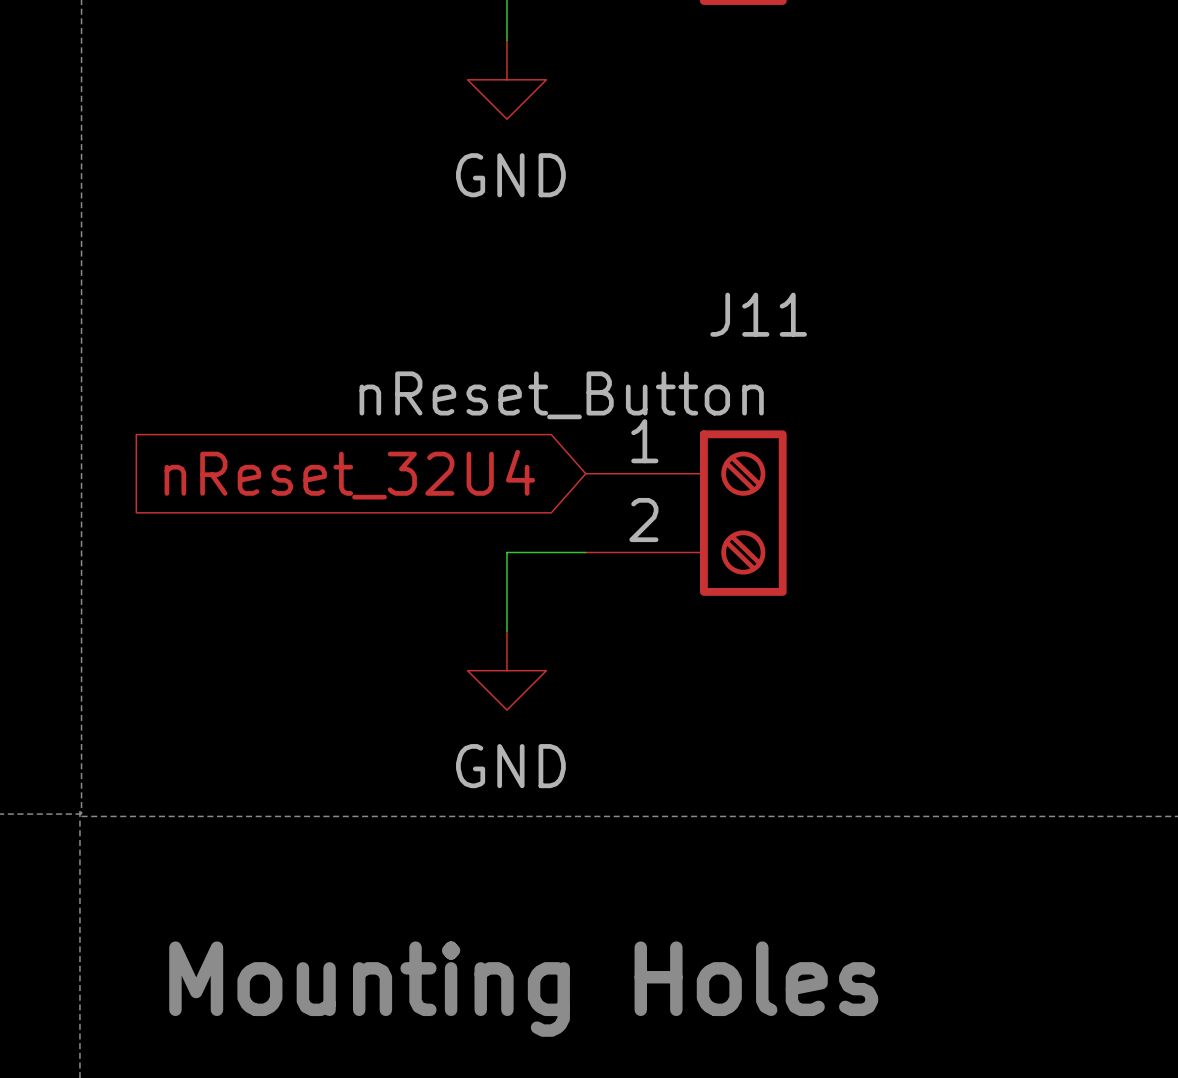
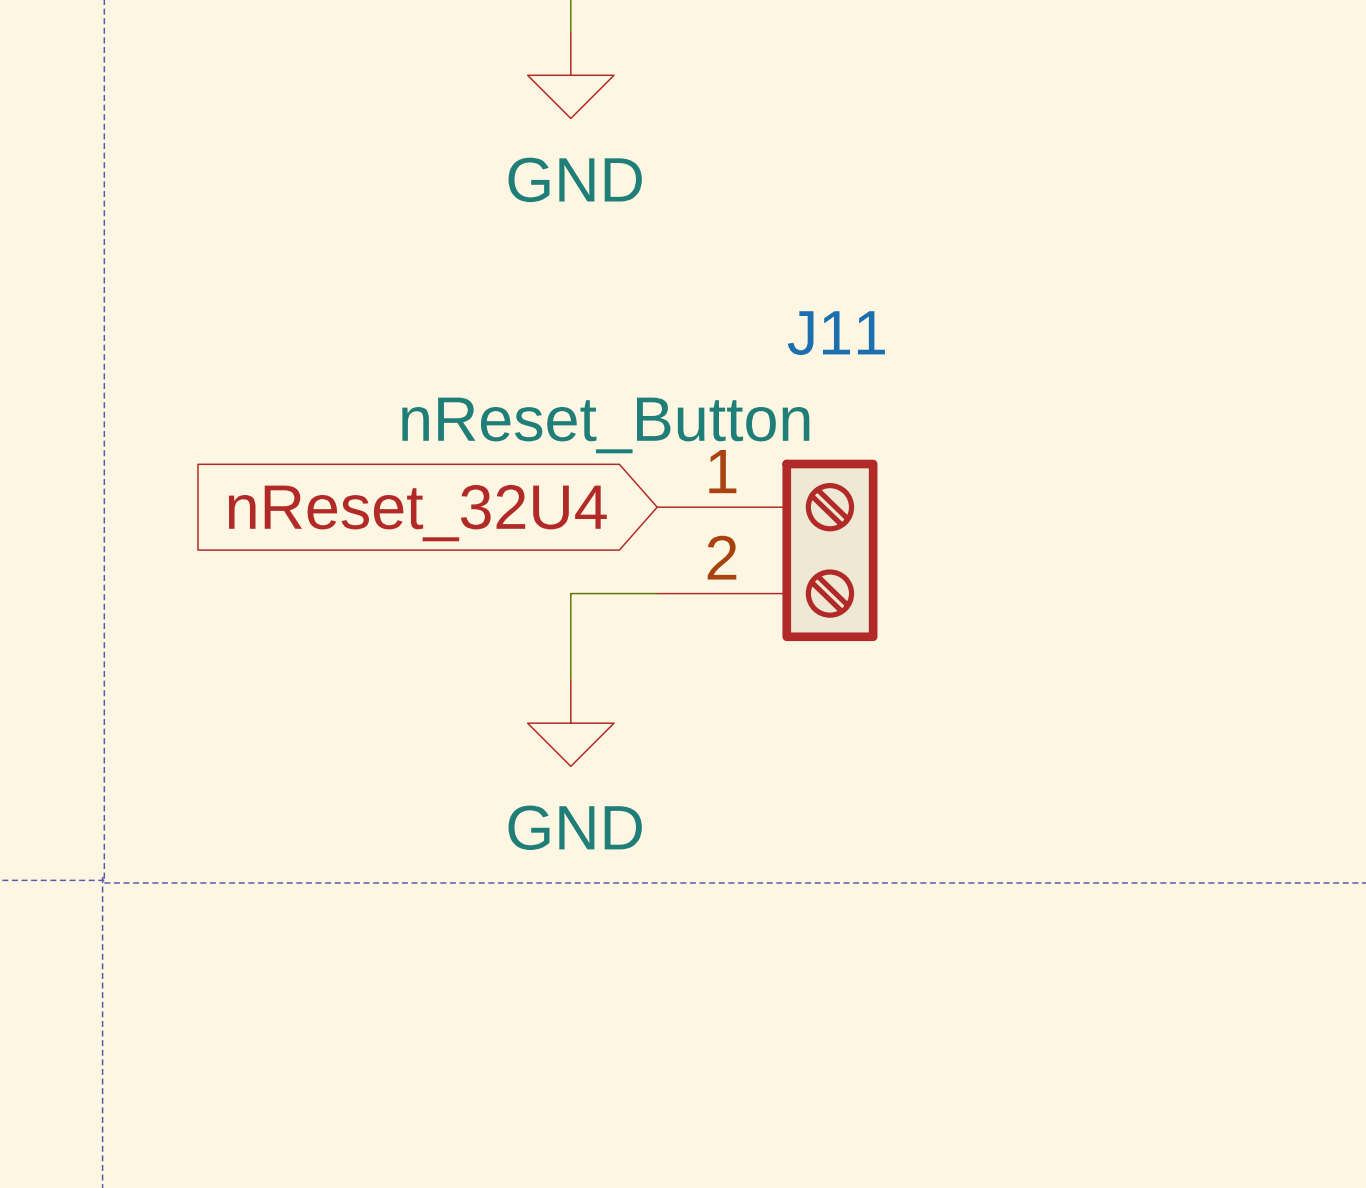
text: Mounting Holes (523, 989) -> none

